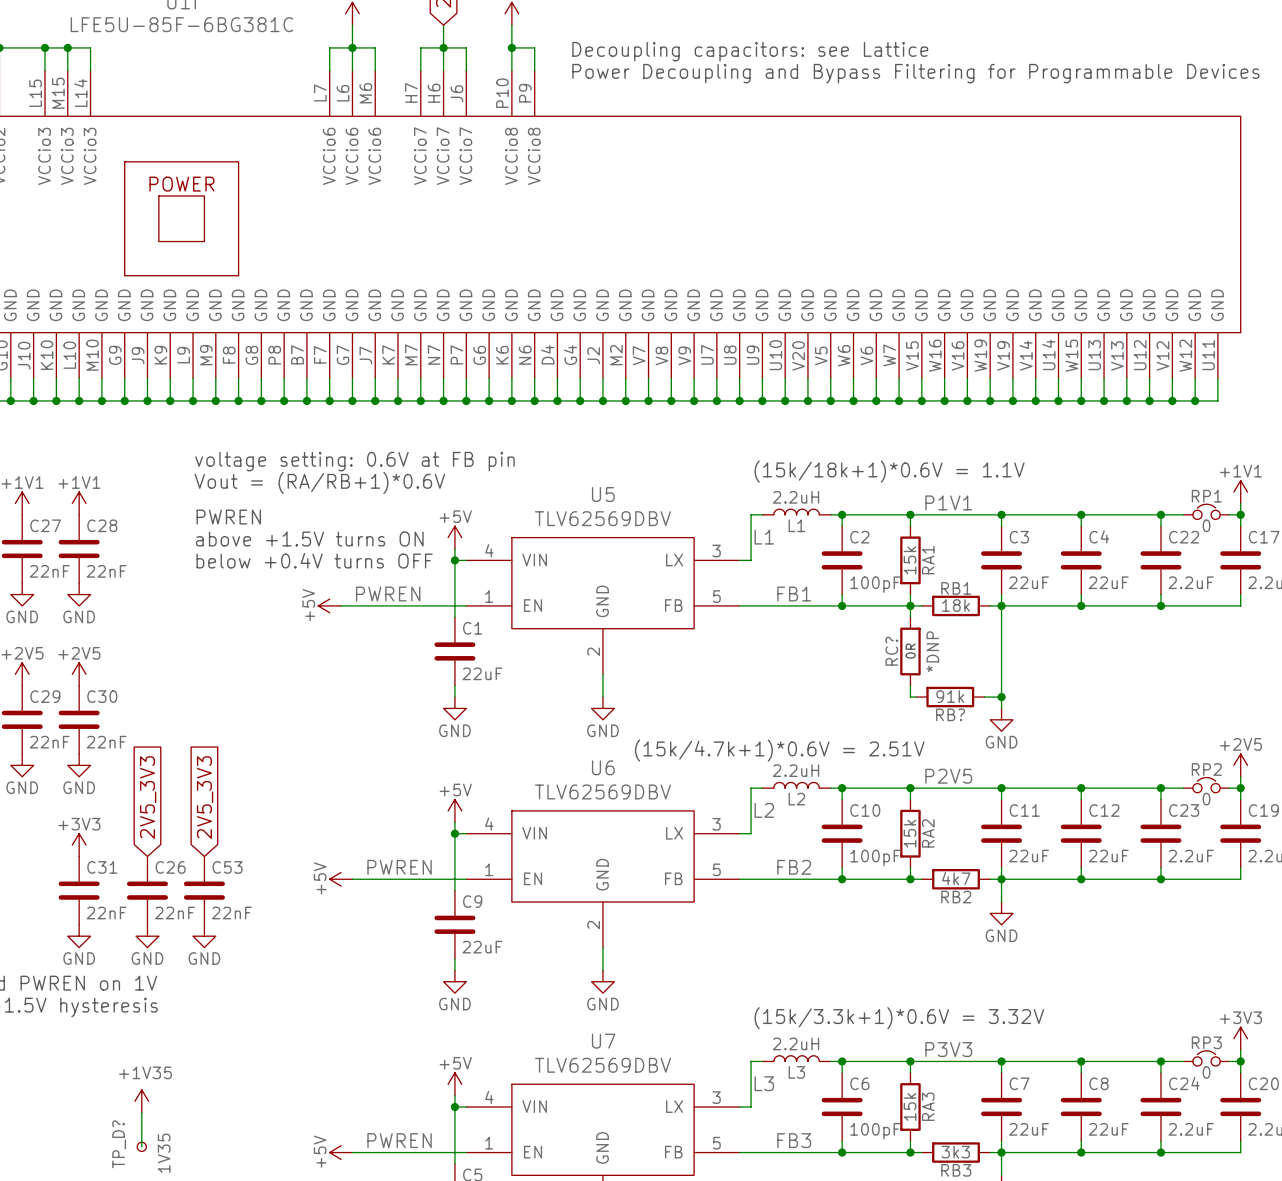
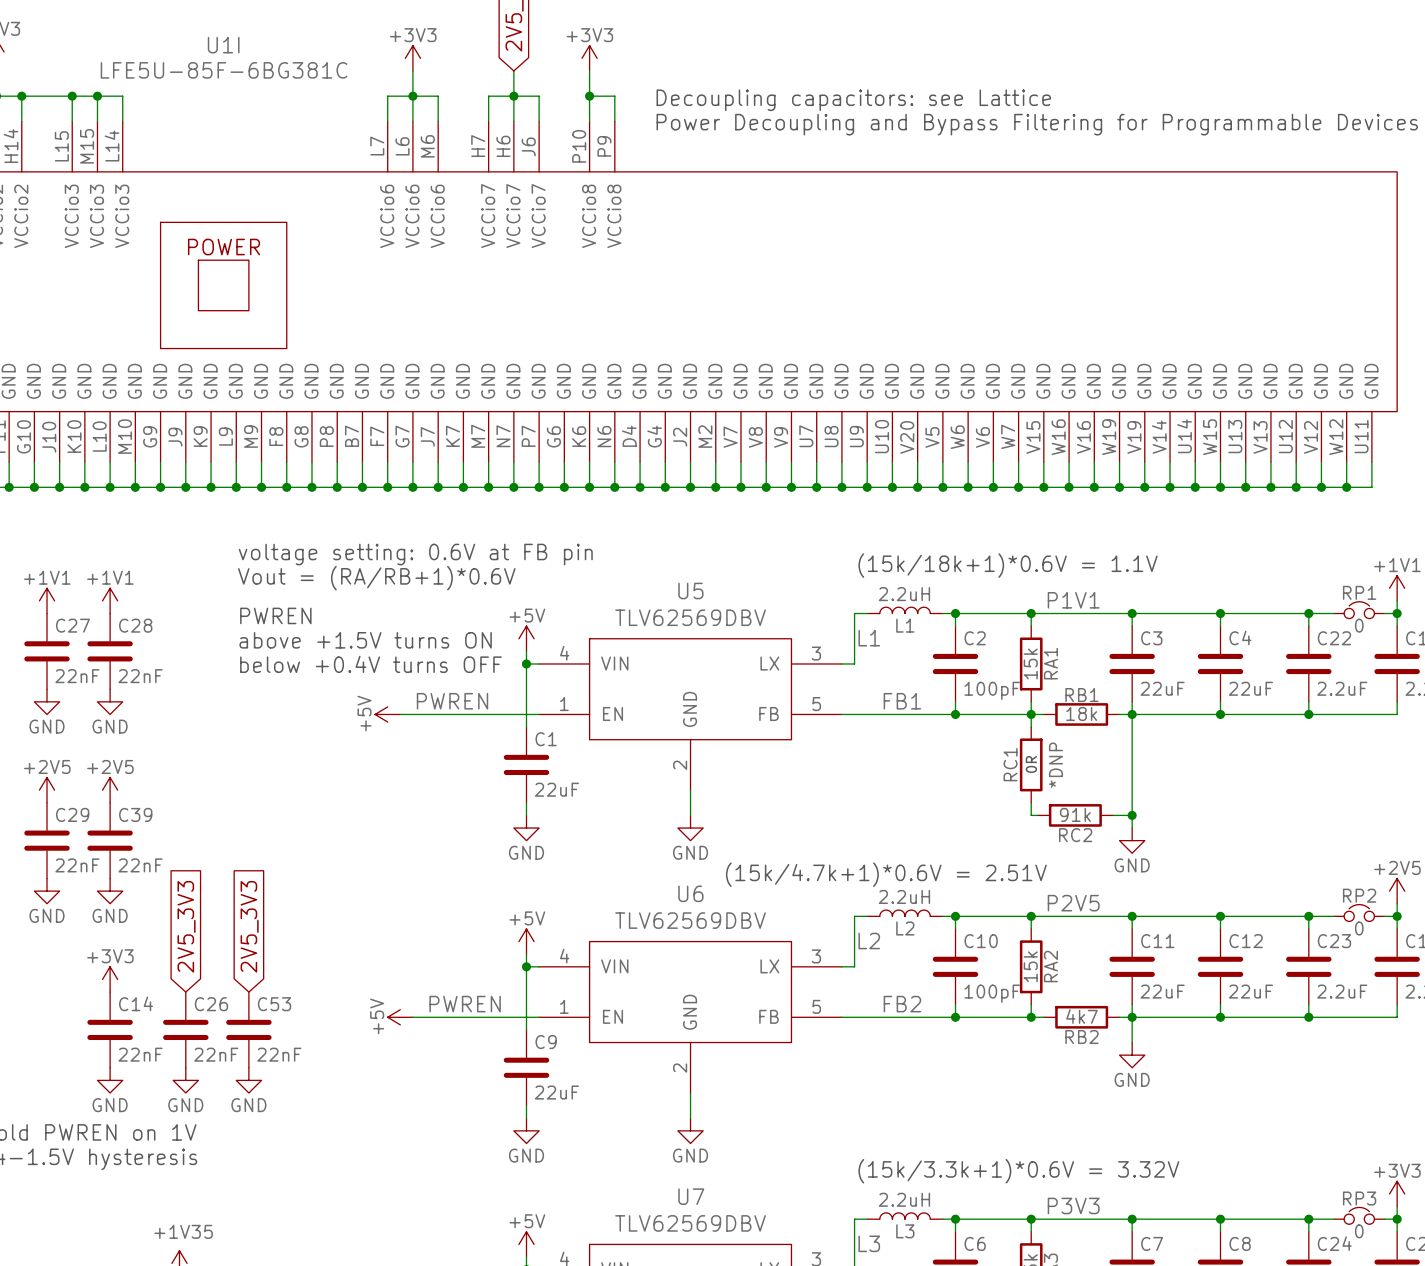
RC? name: RC? (891, 651) -> RC1 (1010, 764)
C30 name: C30 (102, 696) -> C39 (135, 814)
RB? name: RB? (950, 714) -> RC2 (1075, 835)
C31 name: C31 (102, 867) -> C14 (136, 1003)

